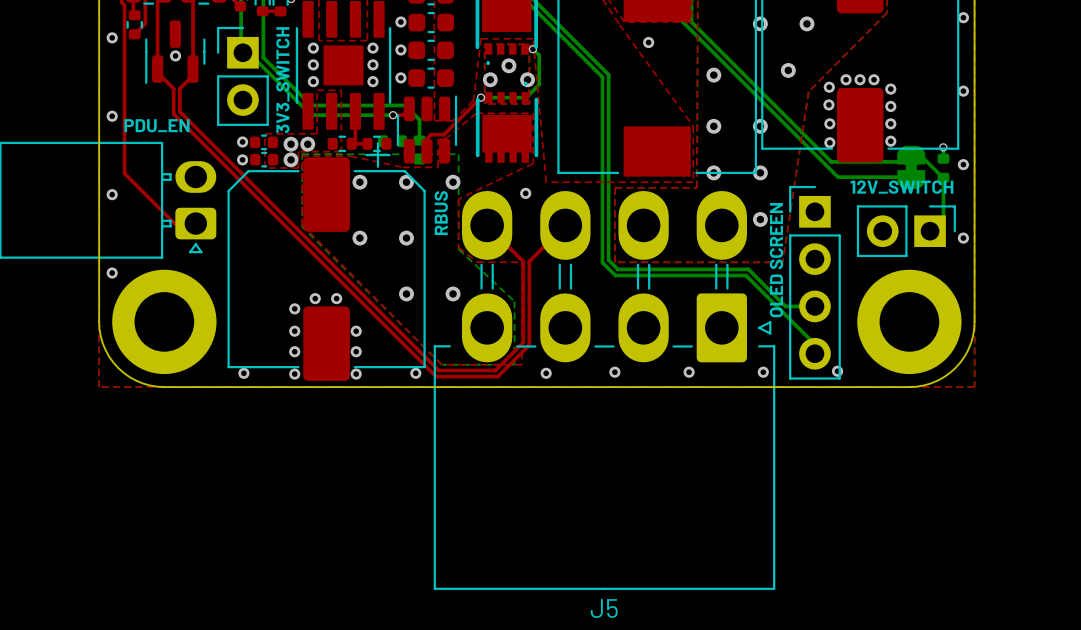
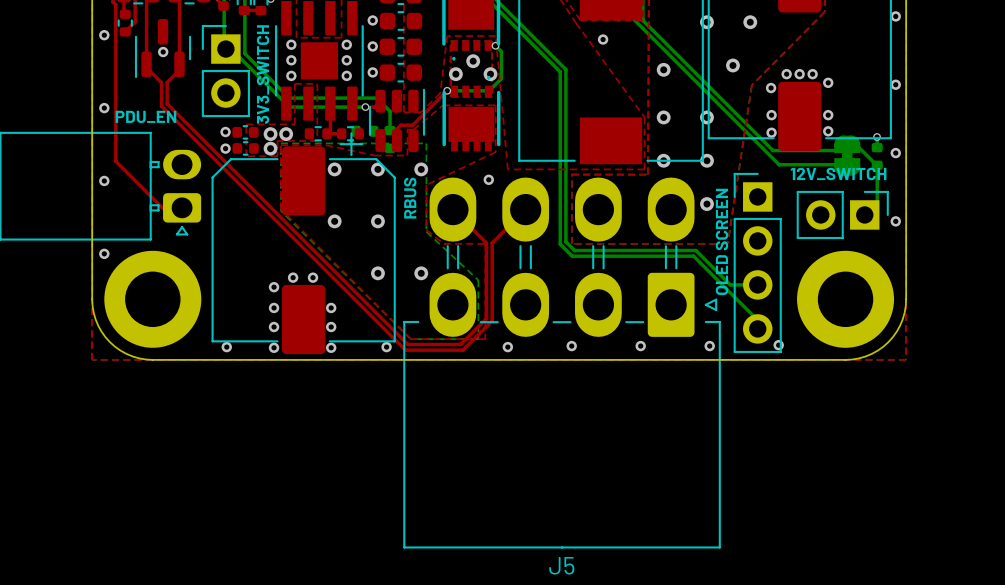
via: (829, 87) -> none
via: none -> (771, 88)
via: (828, 104) -> none
via: (890, 106) -> none

